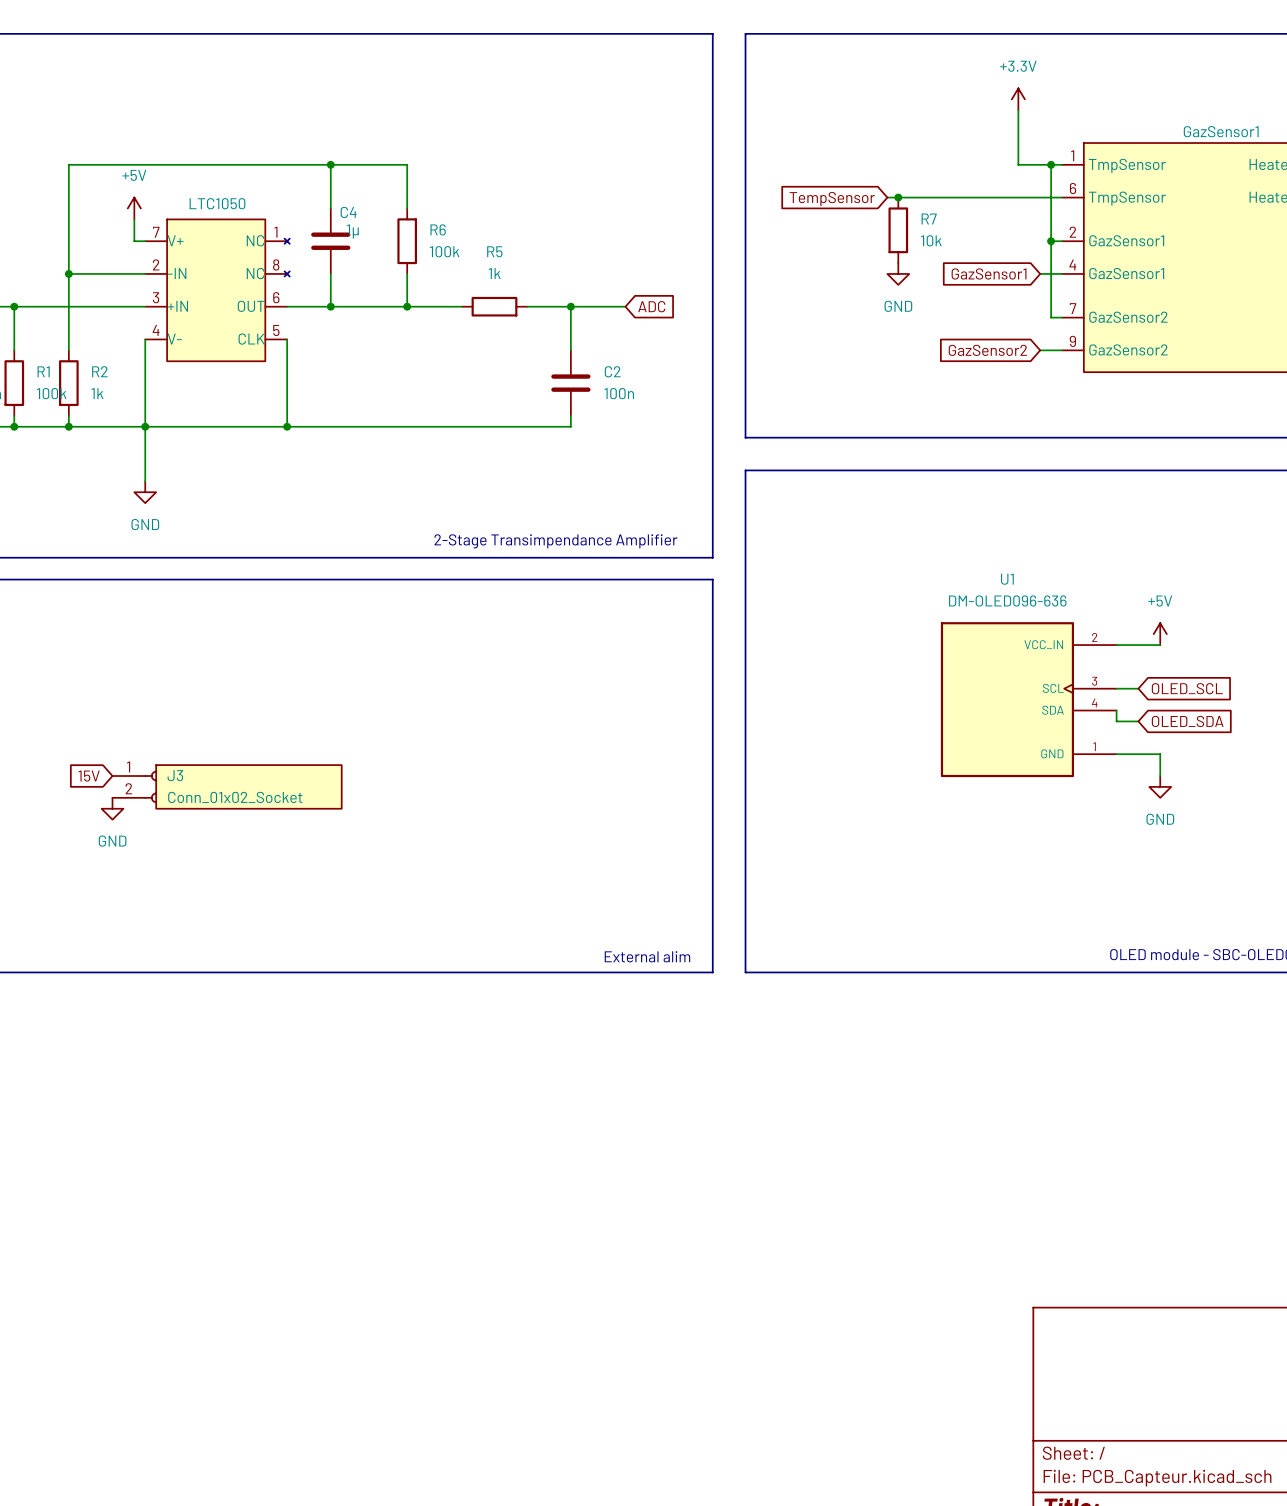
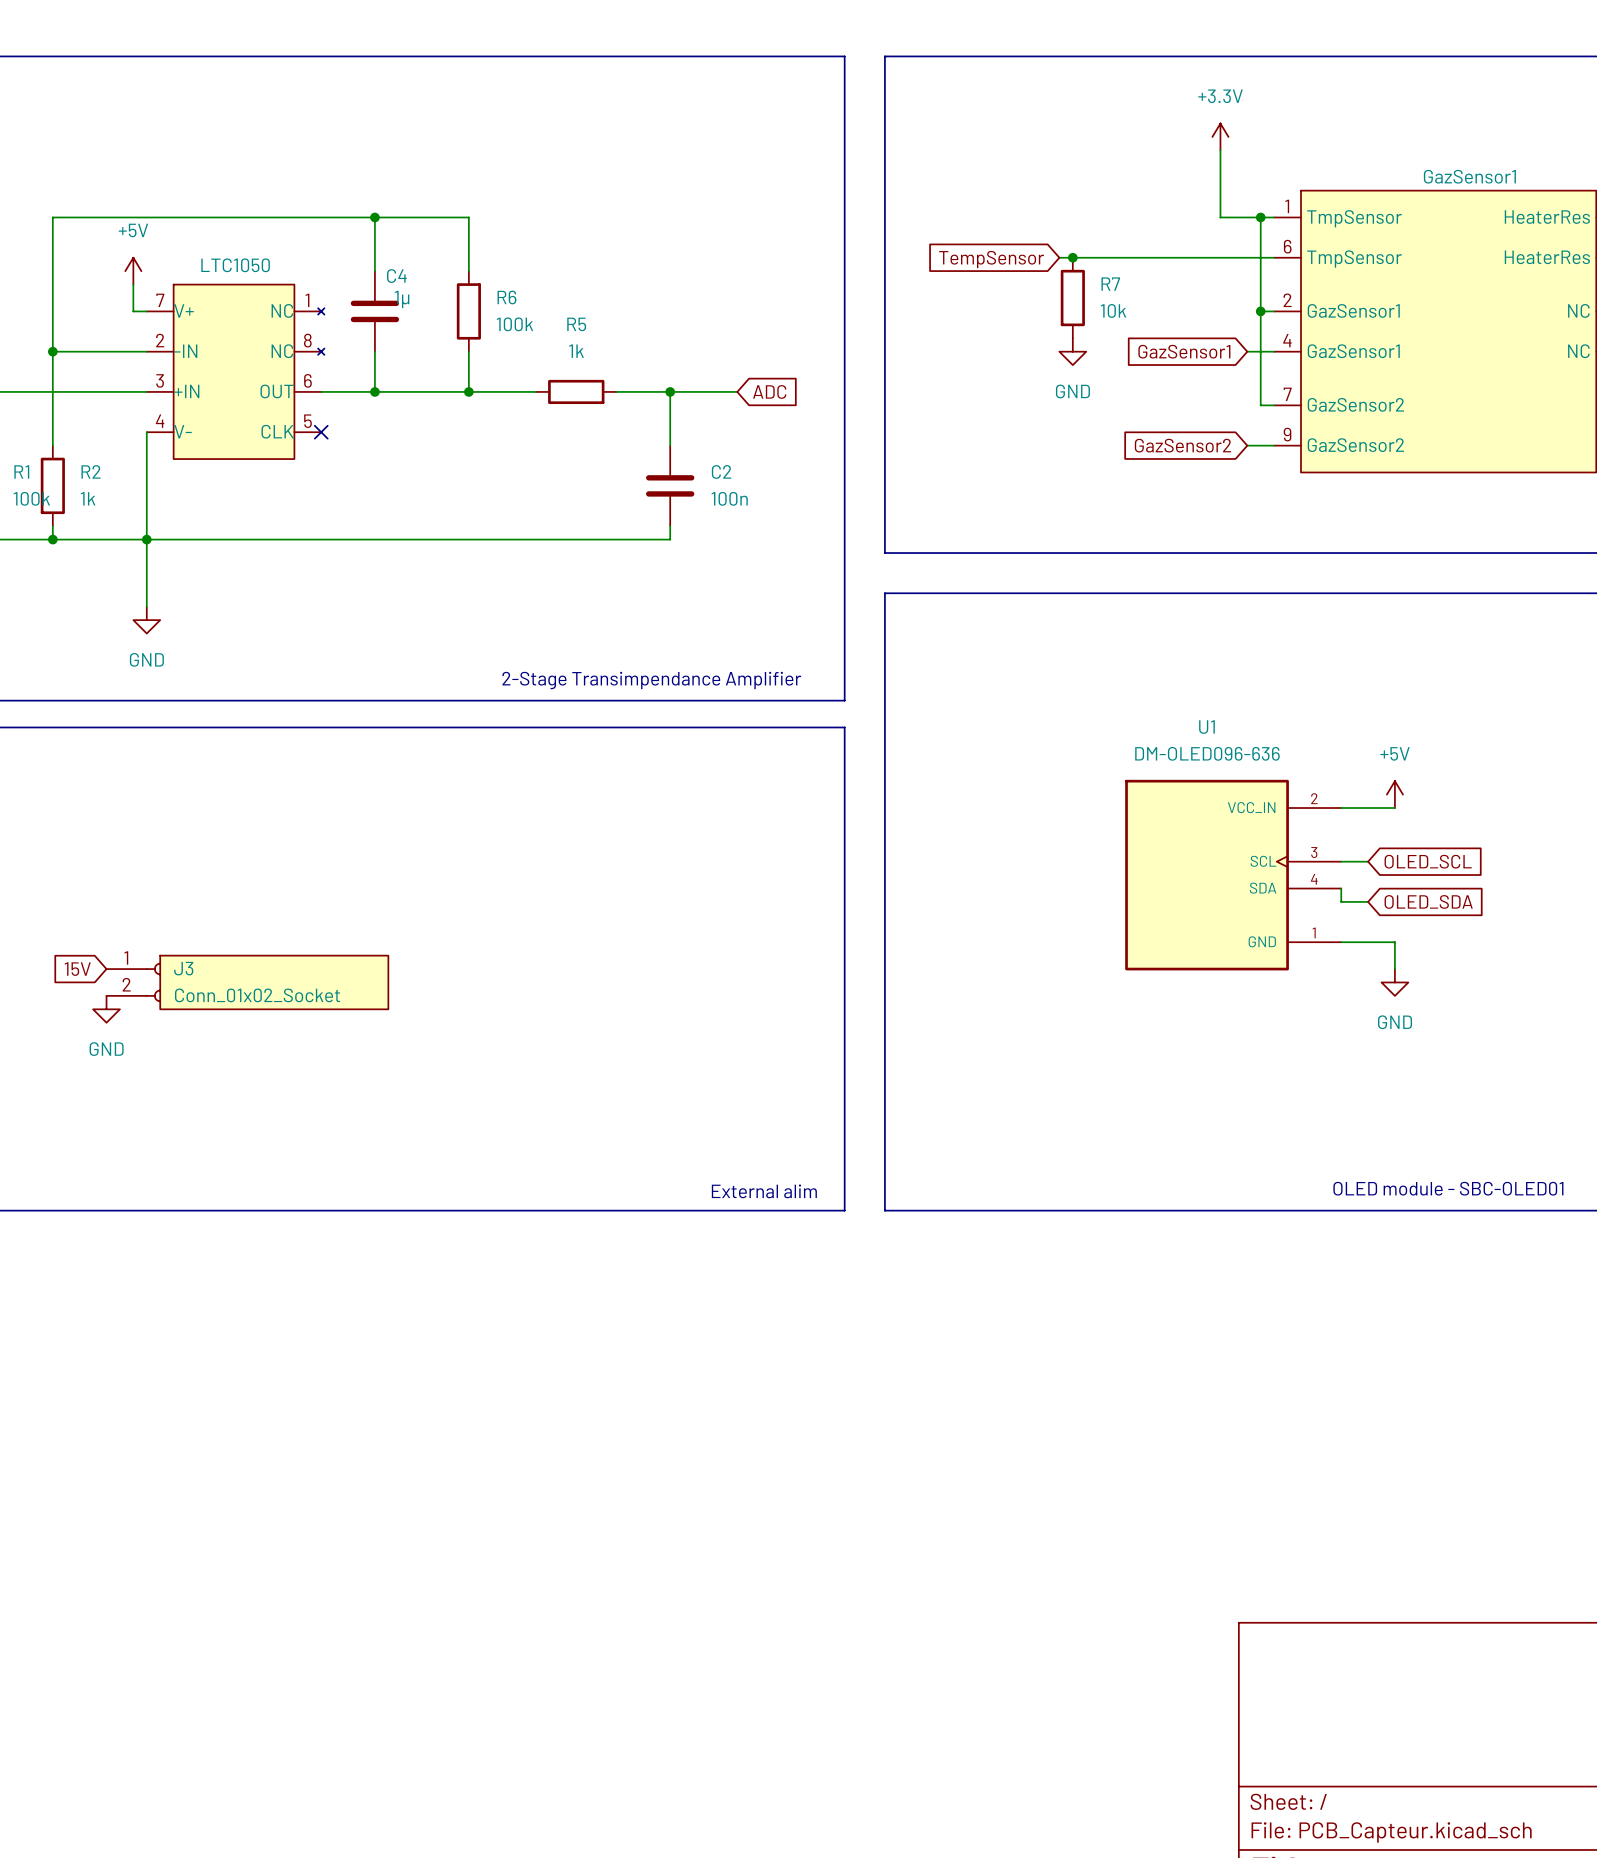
wire: (287, 339) (287, 426) -> none
no-connect mark: none -> (321, 432)
junction: (287, 426) -> none

